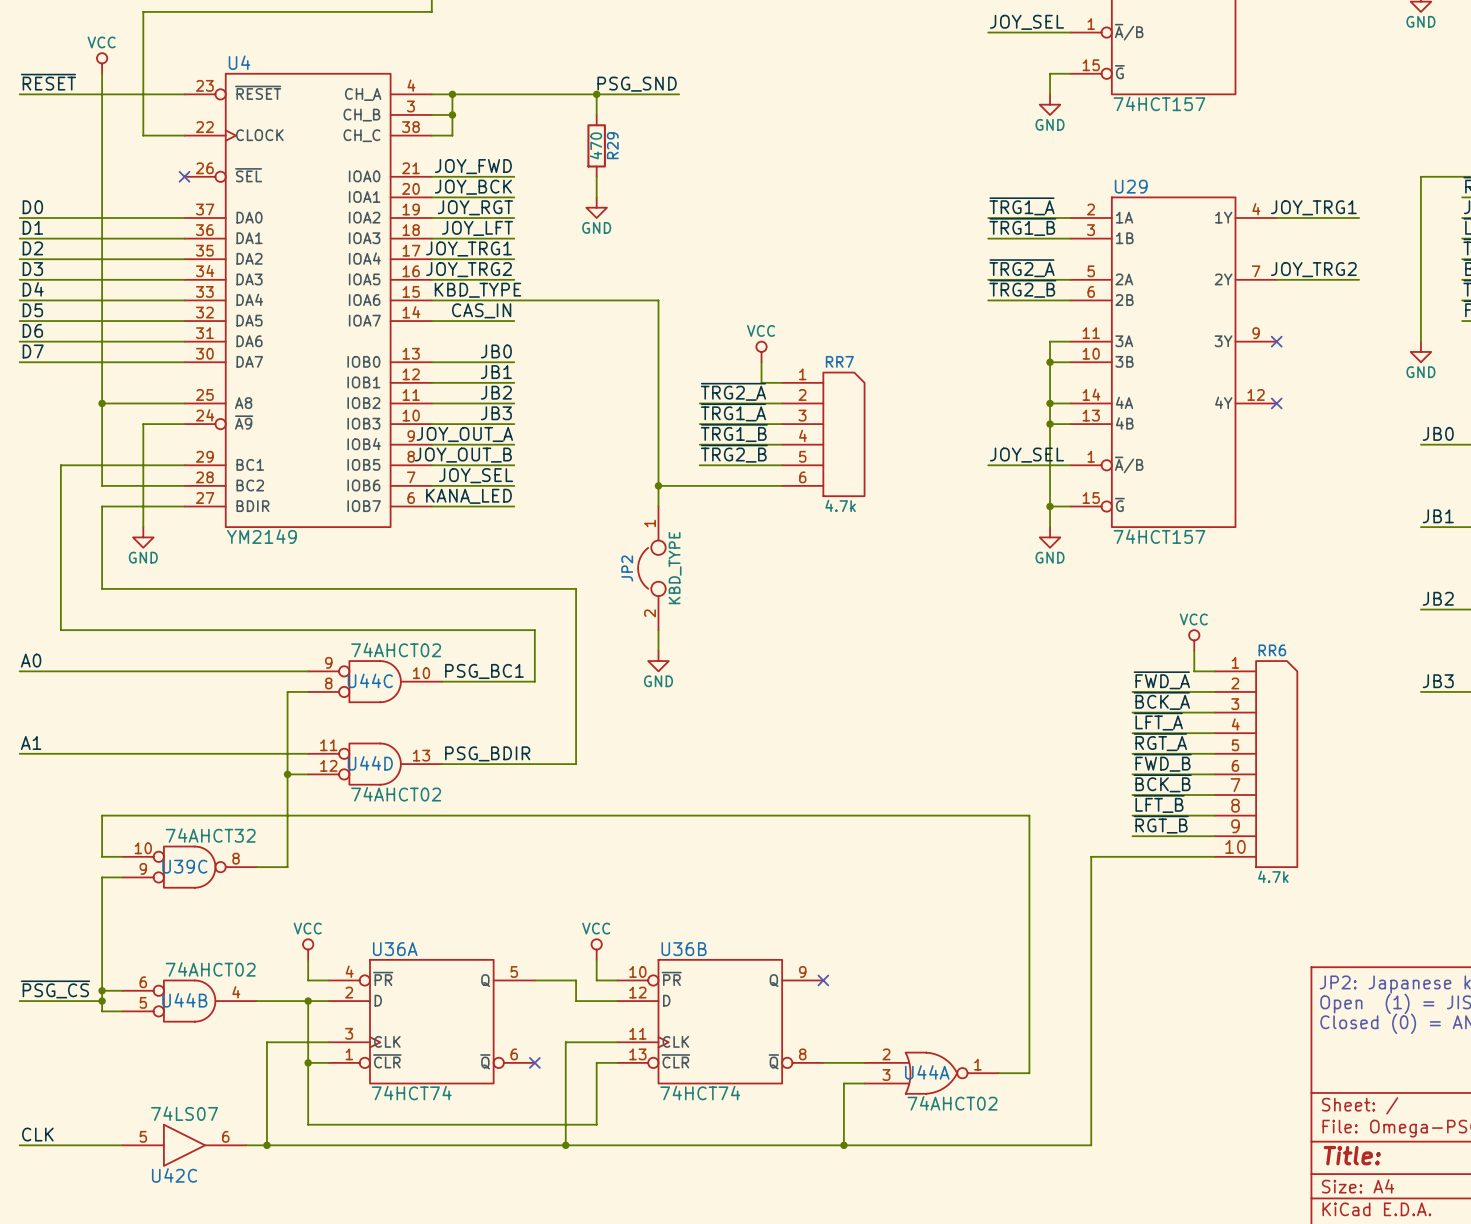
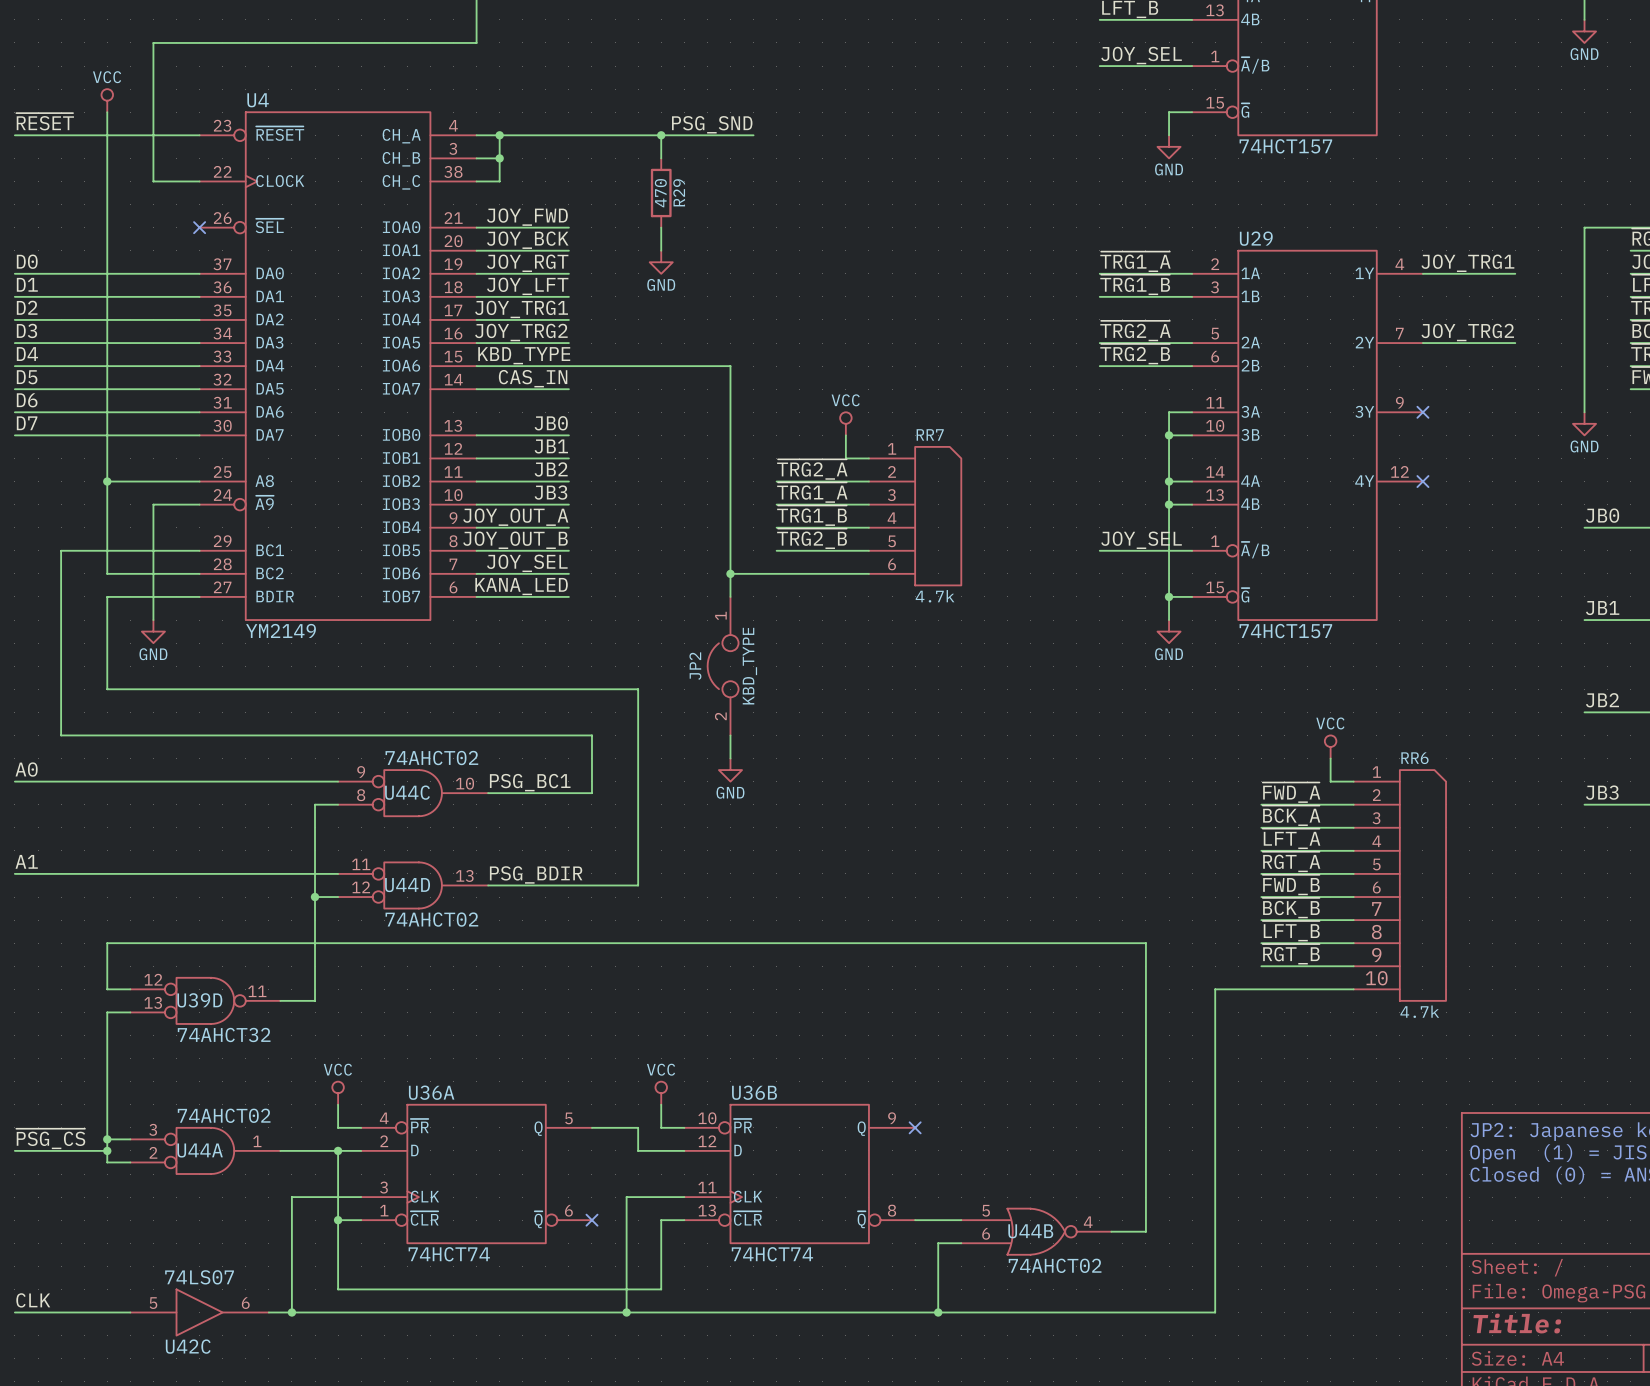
U39C value position: 74AHCT32 (210, 835) -> 74AHCT32 (224, 1034)
U39C pin number: 10 (143, 848) -> 12 (153, 979)
U39C pin number: 8 (236, 858) -> 11 (257, 991)
U39C name: U39C (184, 866) -> U39D (199, 1000)
U39C pin number: 9 (143, 868) -> 13 (153, 1002)
U44B symbol: [122, 980, 257, 1022] -> [961, 1208, 1112, 1255]
U44A symbol: [864, 1052, 999, 1094] -> [130, 1127, 281, 1175]

